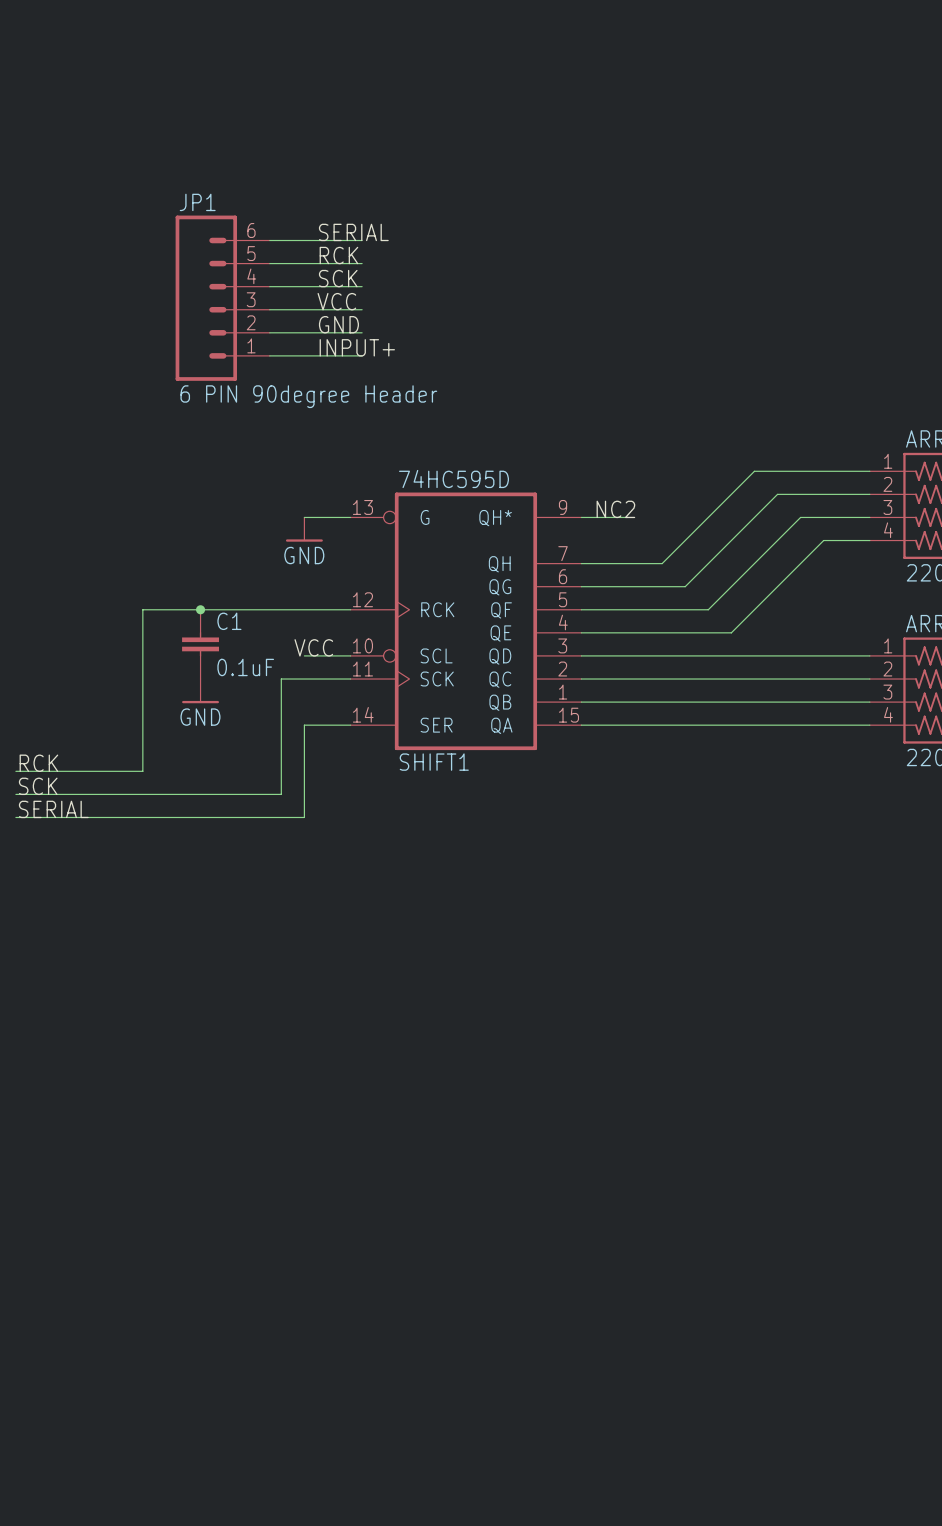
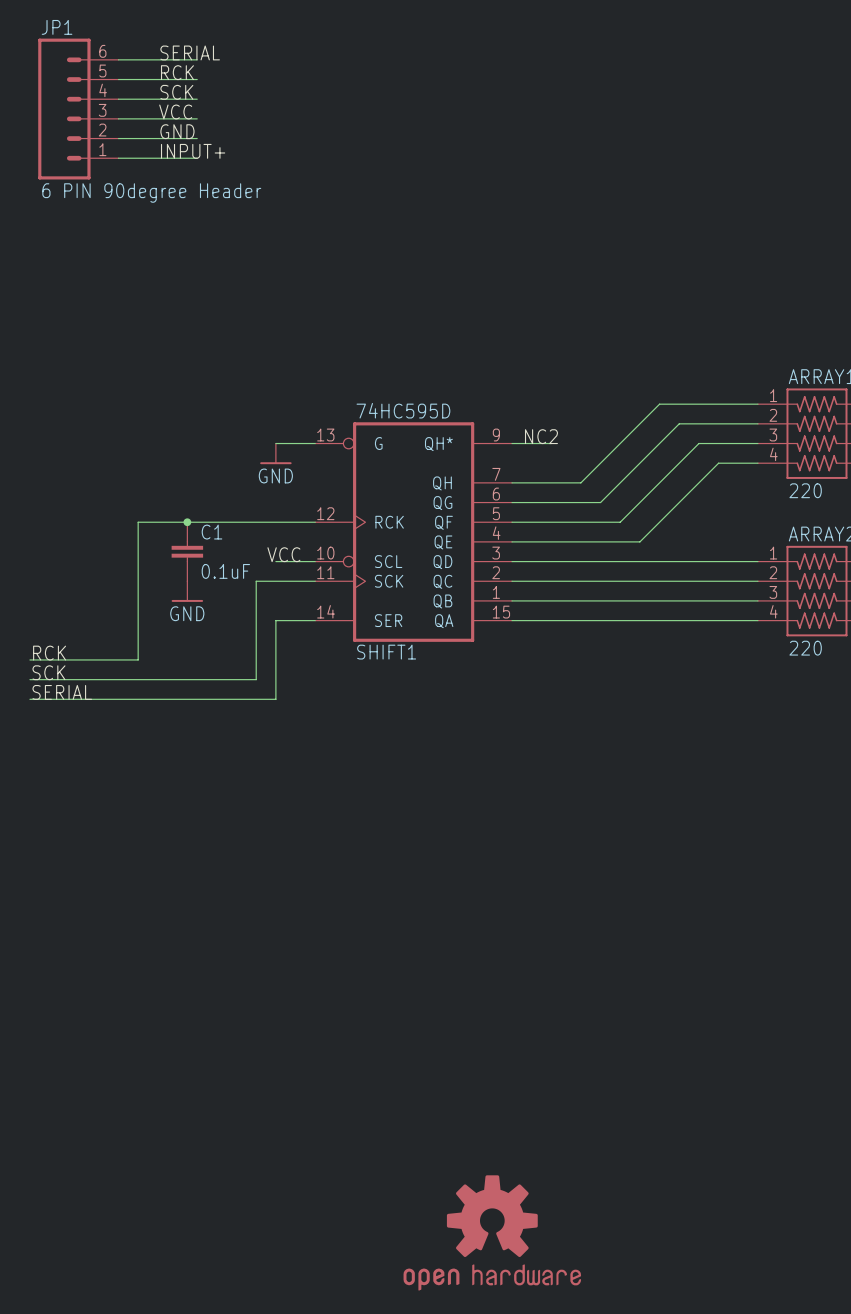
label: none -> SERIAL (190, 52)
wire: none -> (118, 59) (197, 59)
label: none -> RCK (177, 72)
label: none -> SCK (176, 92)
label: none -> VCC (175, 111)
label: none -> GND (177, 131)
label: none -> INPUT+ (193, 151)
label: SERIAL (353, 232) -> none
wire: (269, 240) (362, 240) -> (118, 79) (197, 79)
label: RCK (338, 255) -> none
wire: (269, 263) (362, 263) -> (118, 99) (197, 99)
label: SCK (338, 278) -> none
wire: (269, 286) (362, 286) -> (118, 118) (197, 118)
JP1 position: (222, 298) -> (78, 109)
label: VCC (336, 301) -> none
wire: (269, 309) (362, 309) -> (118, 138) (197, 138)
label: GND (338, 324) -> none
wire: (269, 332) (362, 332) -> (118, 158) (197, 158)
label: INPUT+ (357, 347) -> none
wire: (269, 355) (362, 355) -> none
part: none -> (492, 1232)

